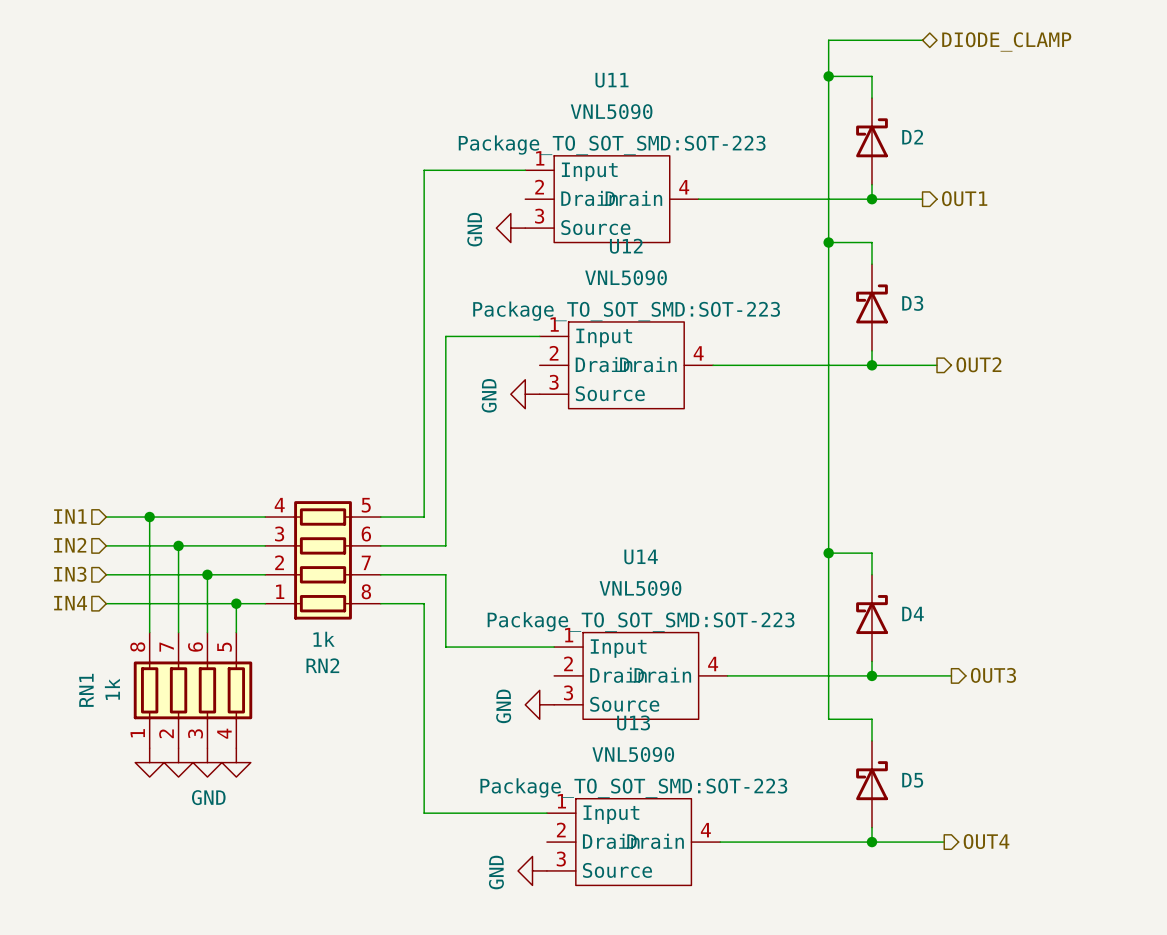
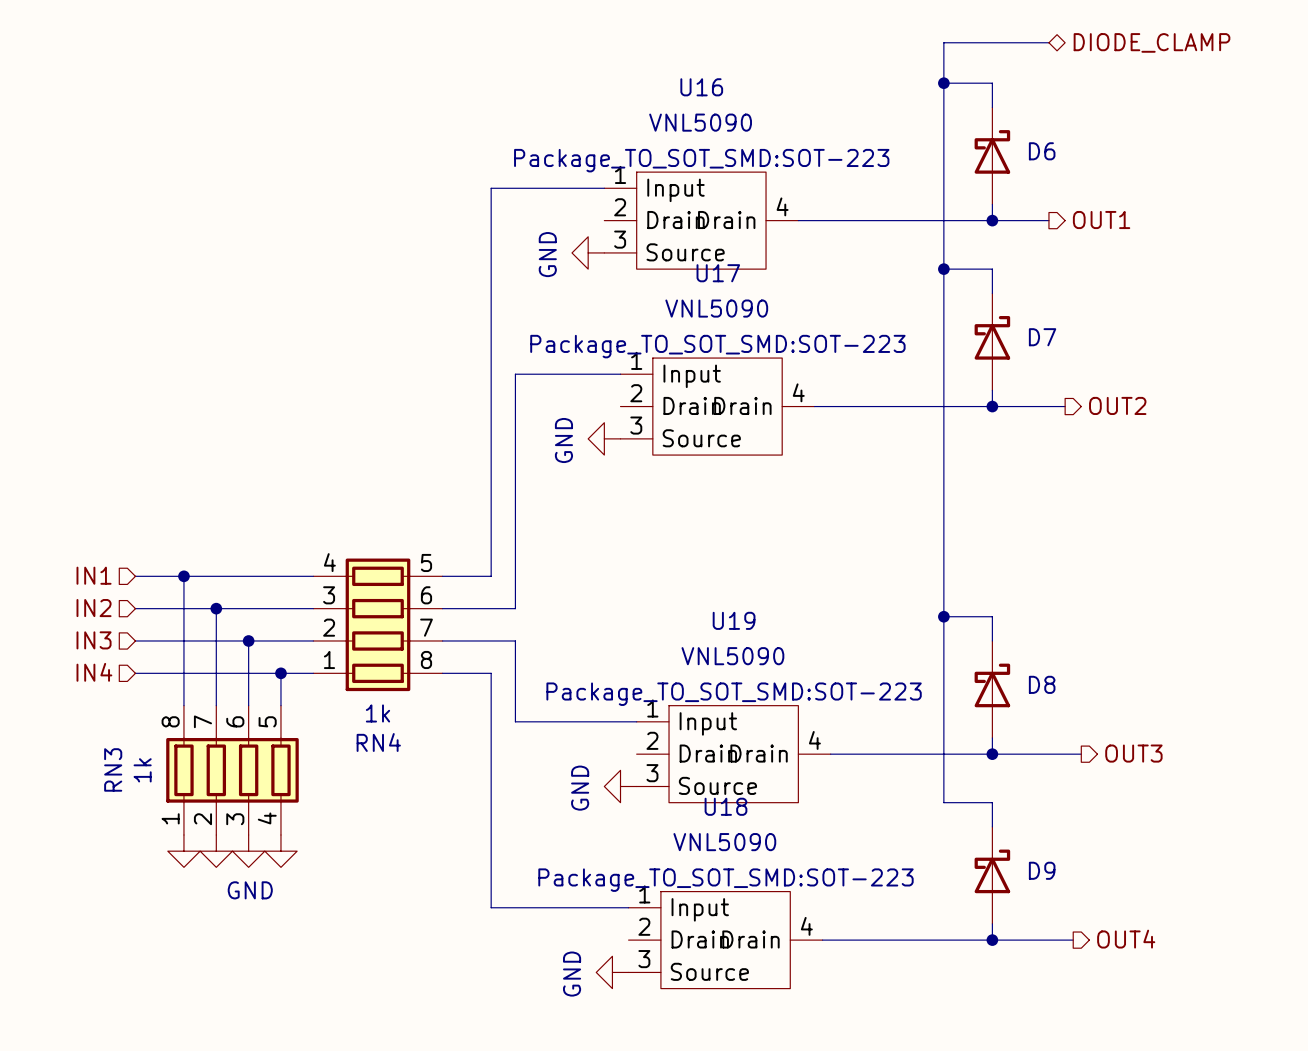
U11 name: U11 (611, 80) -> U16 (701, 87)
D2 name: D2 (912, 137) -> D6 (1042, 151)
U12 name: U12 (626, 246) -> U17 (718, 273)
D3 name: D3 (912, 303) -> D7 (1042, 337)
U14 name: U14 (641, 556) -> U19 (734, 620)
D4 name: D4 (913, 613) -> D8 (1042, 684)
RN2 name: RN2 (322, 665) -> RN4 (378, 742)
RN1 name: RN1 (86, 690) -> RN3 (113, 769)
U13 name: U13 (633, 722) -> U18 (725, 806)
D5 name: D5 (912, 780) -> D9 (1042, 870)

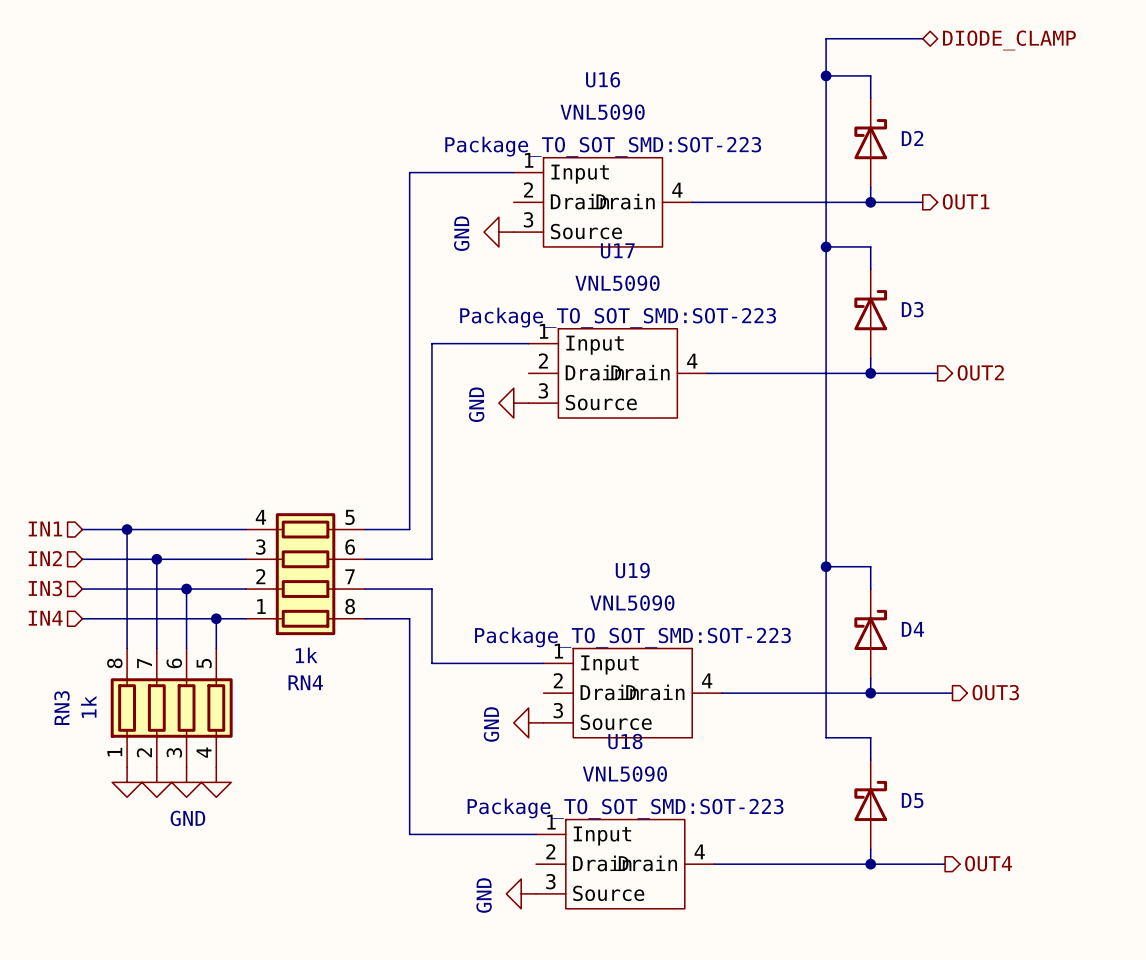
D6 name: D6 (1042, 151) -> D2 (912, 138)
D7 name: D7 (1042, 337) -> D3 (912, 309)
D8 name: D8 (1042, 684) -> D4 (912, 629)
D9 name: D9 (1042, 870) -> D5 (912, 800)

